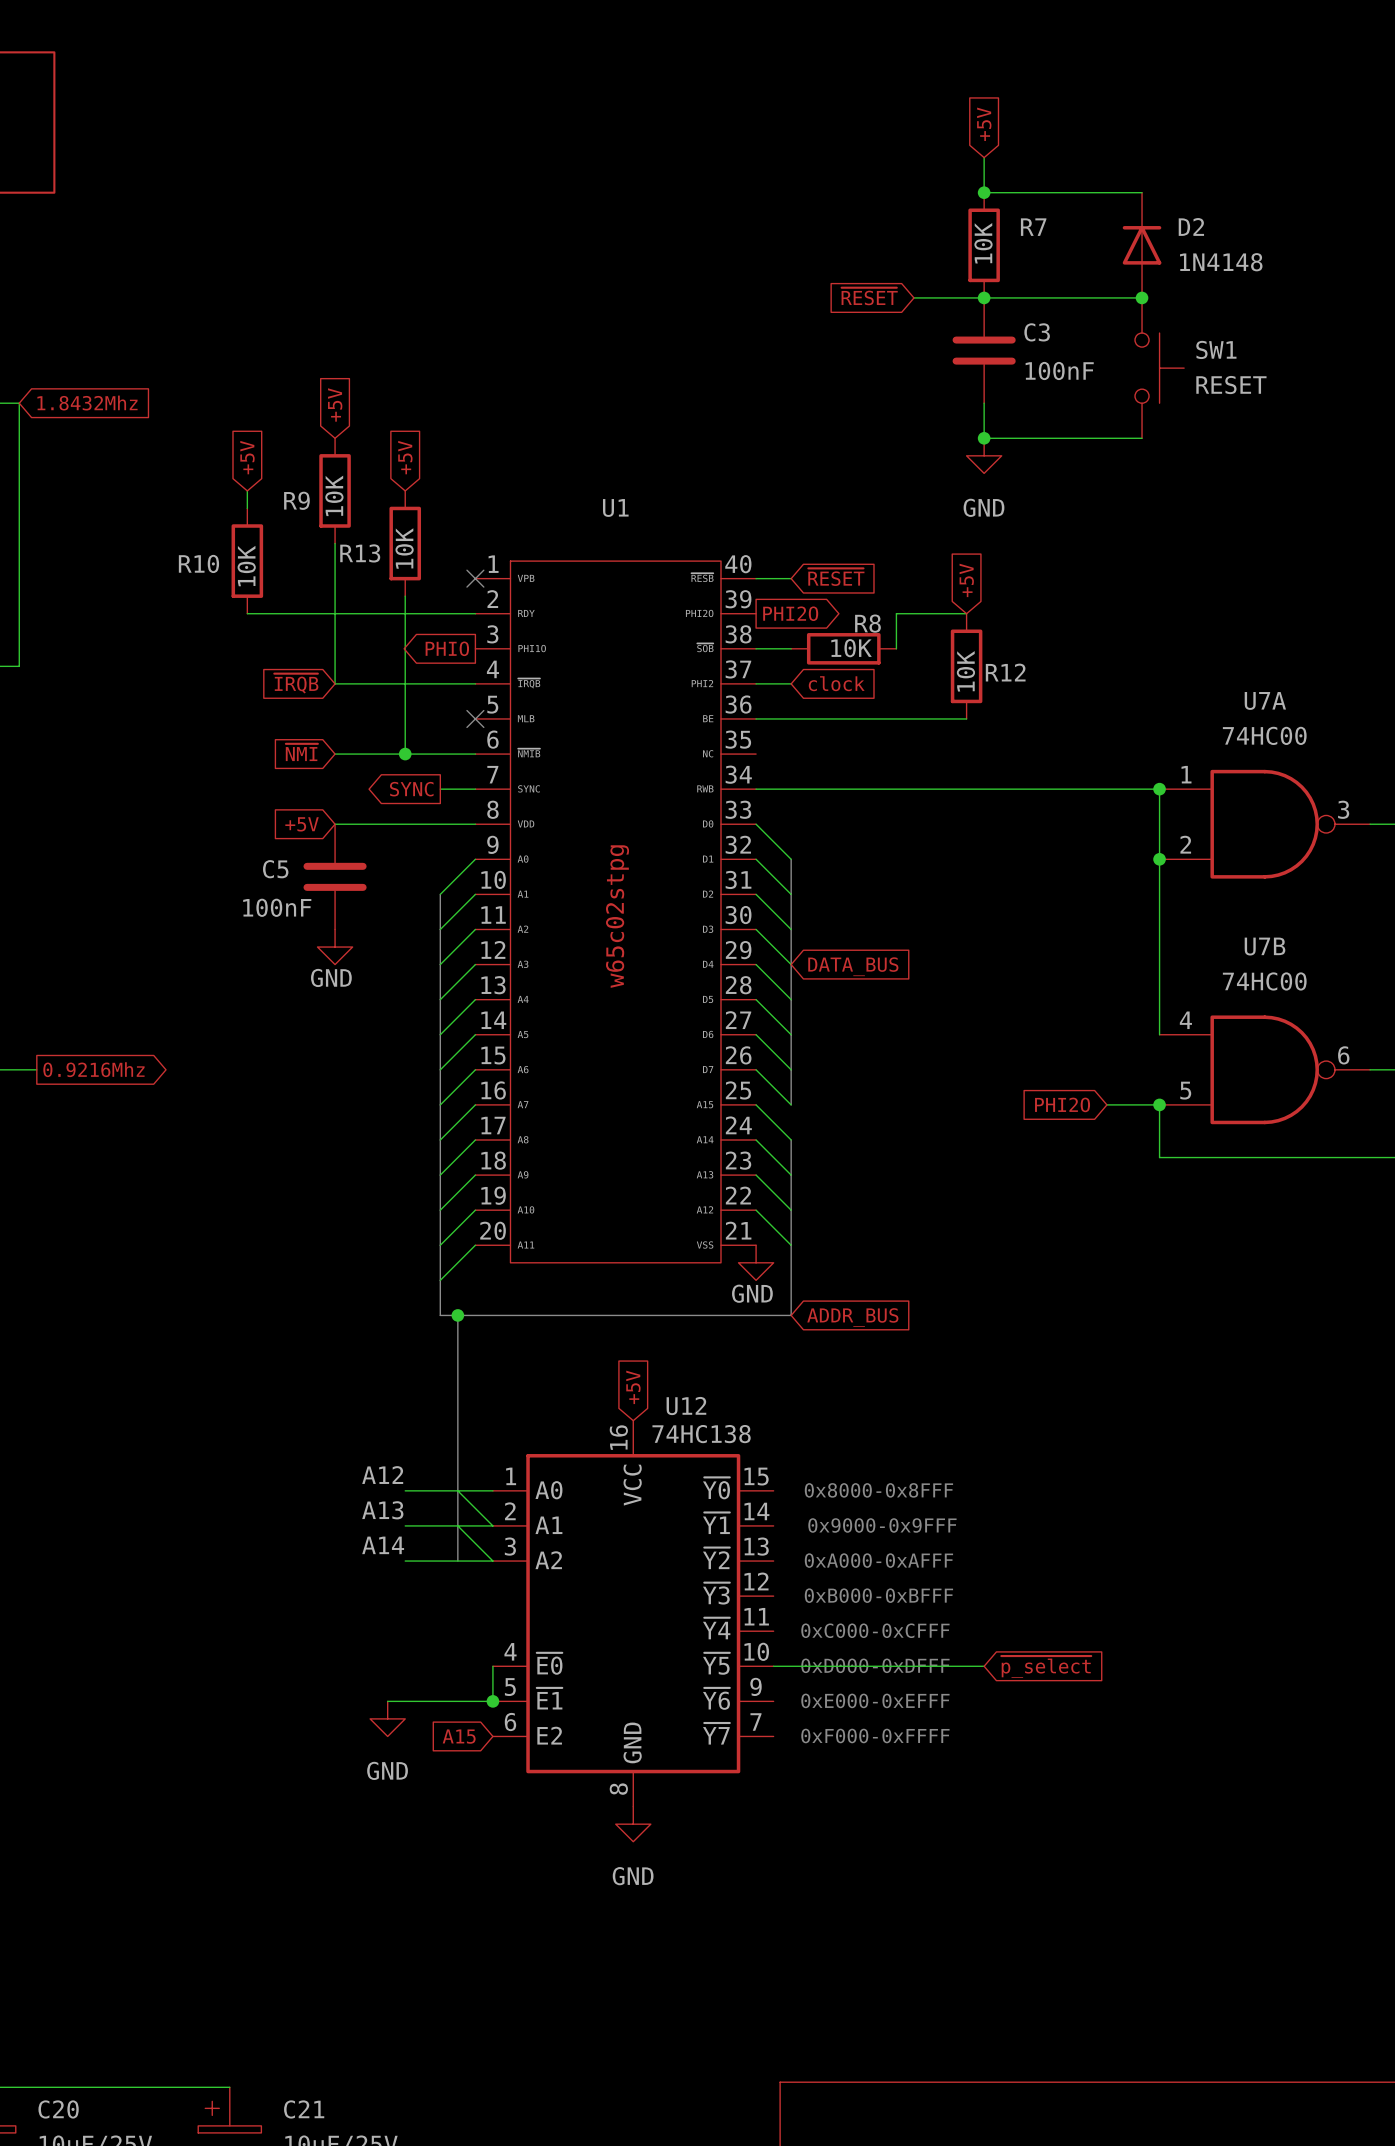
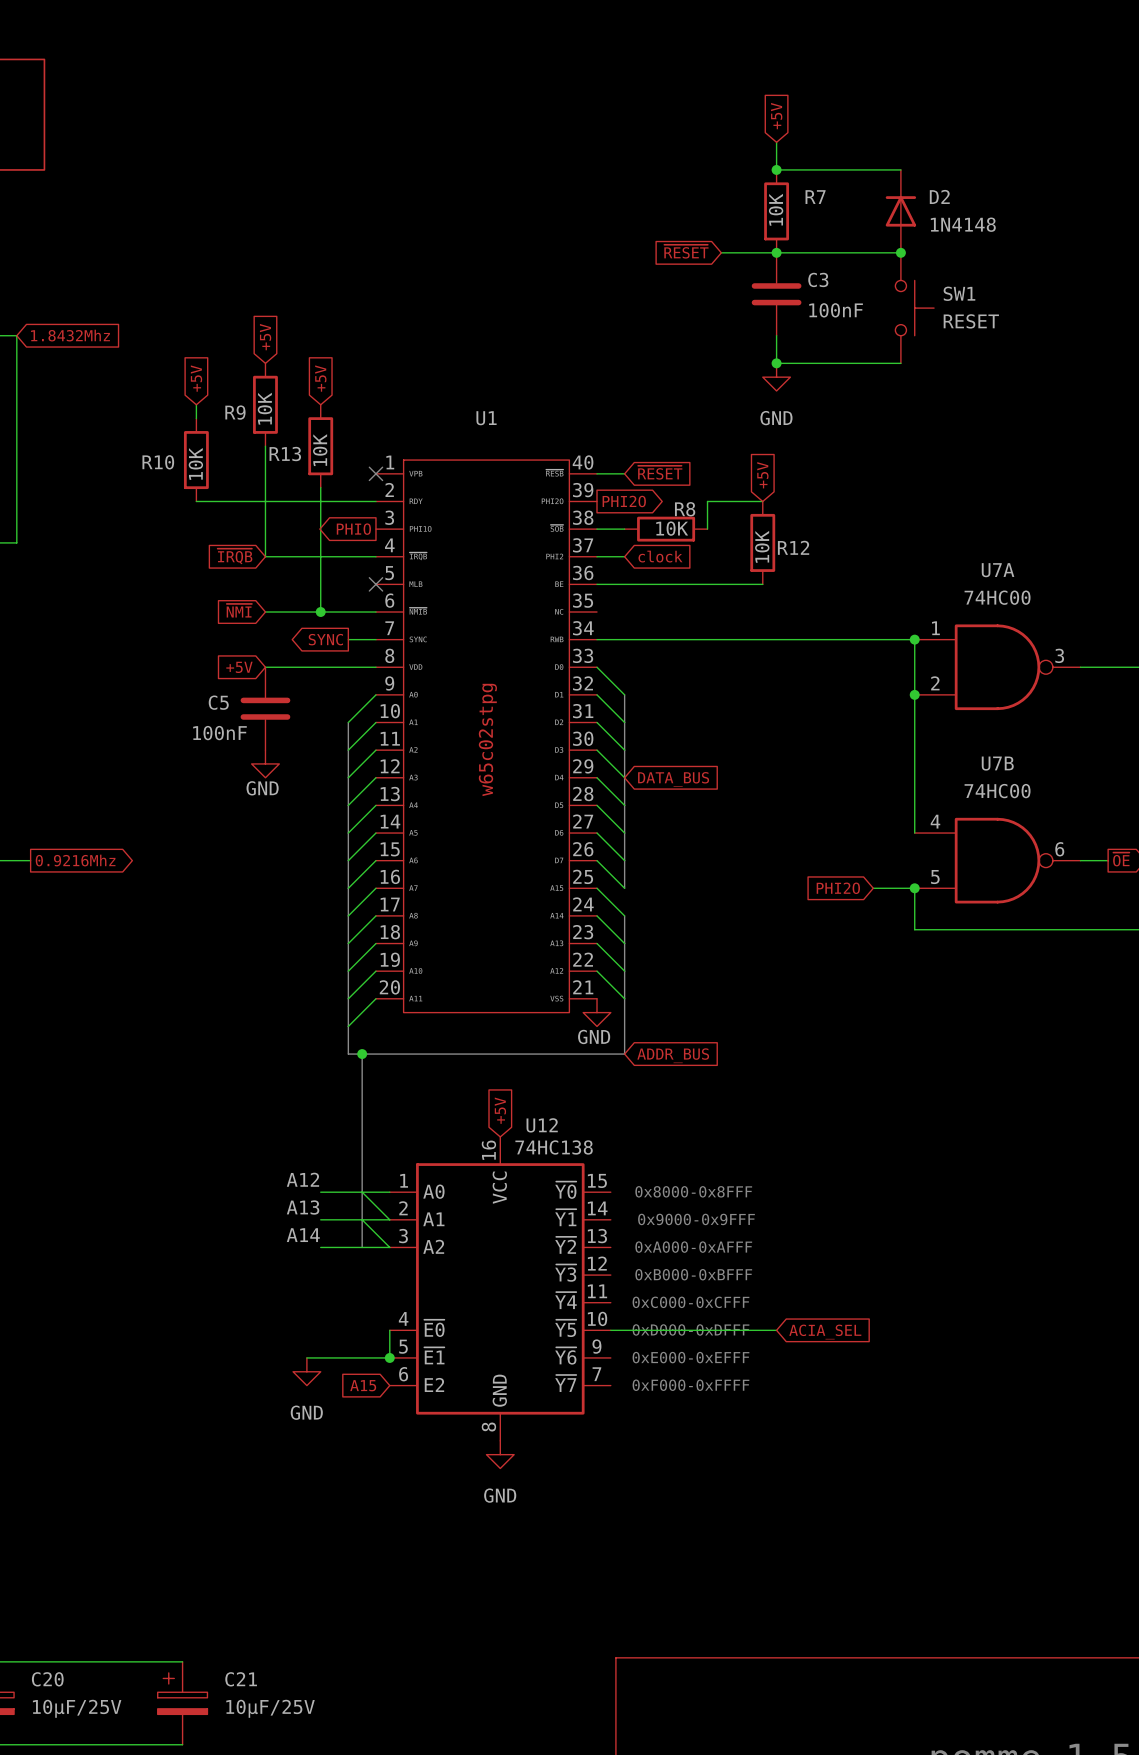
global label: ~{p_select} (1046, 1666) -> ACIA_SEL (825, 1332)

